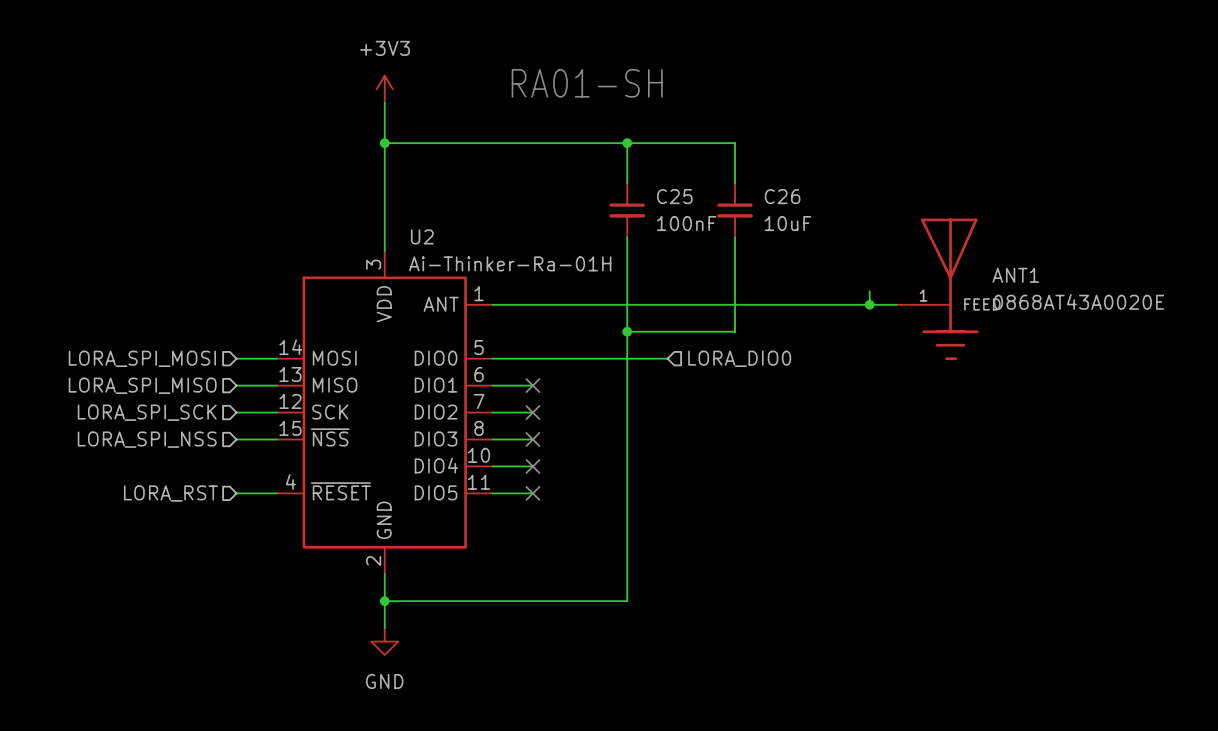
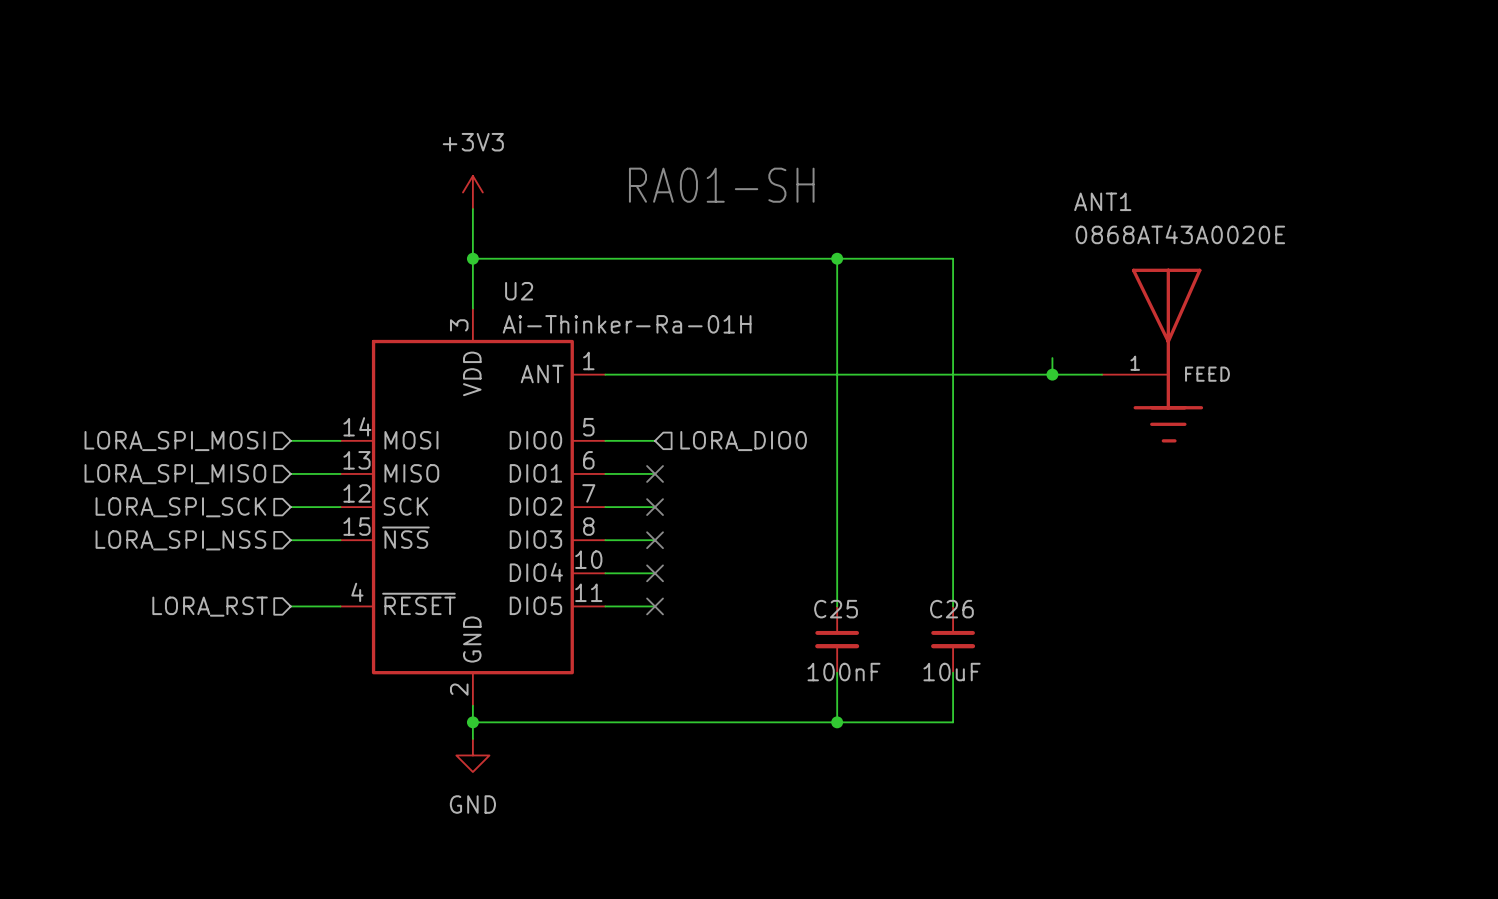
text position: RA01-SH (587, 83) -> RA01-SH (721, 185)
power symbol position: +3V3 (384, 89) -> +3V3 (472, 192)
wire: (384, 102) (384, 170) -> none
wire: (384, 143) (734, 143) (734, 183) -> none
junction: (384, 143) -> none
wire: (627, 143) (627, 183) -> none
junction: (627, 143) -> none
C25 name position: C25 (674, 196) -> C25 (836, 609)
C26 name position: C26 (782, 196) -> C26 (951, 609)
wire: none -> (472, 258) (953, 258) (953, 606)
junction: none -> (472, 258)
C25 position: (627, 210) -> (837, 639)
wire: none -> (837, 258) (837, 606)
junction: none -> (837, 258)
C26 position: (734, 210) -> (953, 639)
C25 value position: 100nF (686, 223) -> 100nF (844, 672)
C26 value position: 10uF (788, 223) -> 10uF (952, 672)
wire: (627, 237) (627, 601) (384, 601) (384, 628) -> none
wire: (734, 237) (734, 331) (627, 331) -> none
ANT1 name position: ANT1 (1015, 275) -> ANT1 (1102, 201)
wire: (869, 291) (869, 304) -> (1052, 358) (1052, 374)
ANT1 value position: 0868AT43A0020E (1078, 301) -> 0868AT43A0020E (1180, 234)
junction position: (869, 304) -> (1052, 374)
junction: (627, 331) -> none
wire: (532, 358) (667, 358) -> none
hierarchical label position: LORA_DIO0 (739, 358) -> LORA_DIO0 (743, 441)
wire: none -> (837, 672) (837, 722)
wire: none -> (953, 672) (953, 722) (472, 722)
junction: none -> (837, 722)
junction position: (384, 601) -> (472, 722)
power symbol position: GND (384, 641) -> GND (472, 755)

